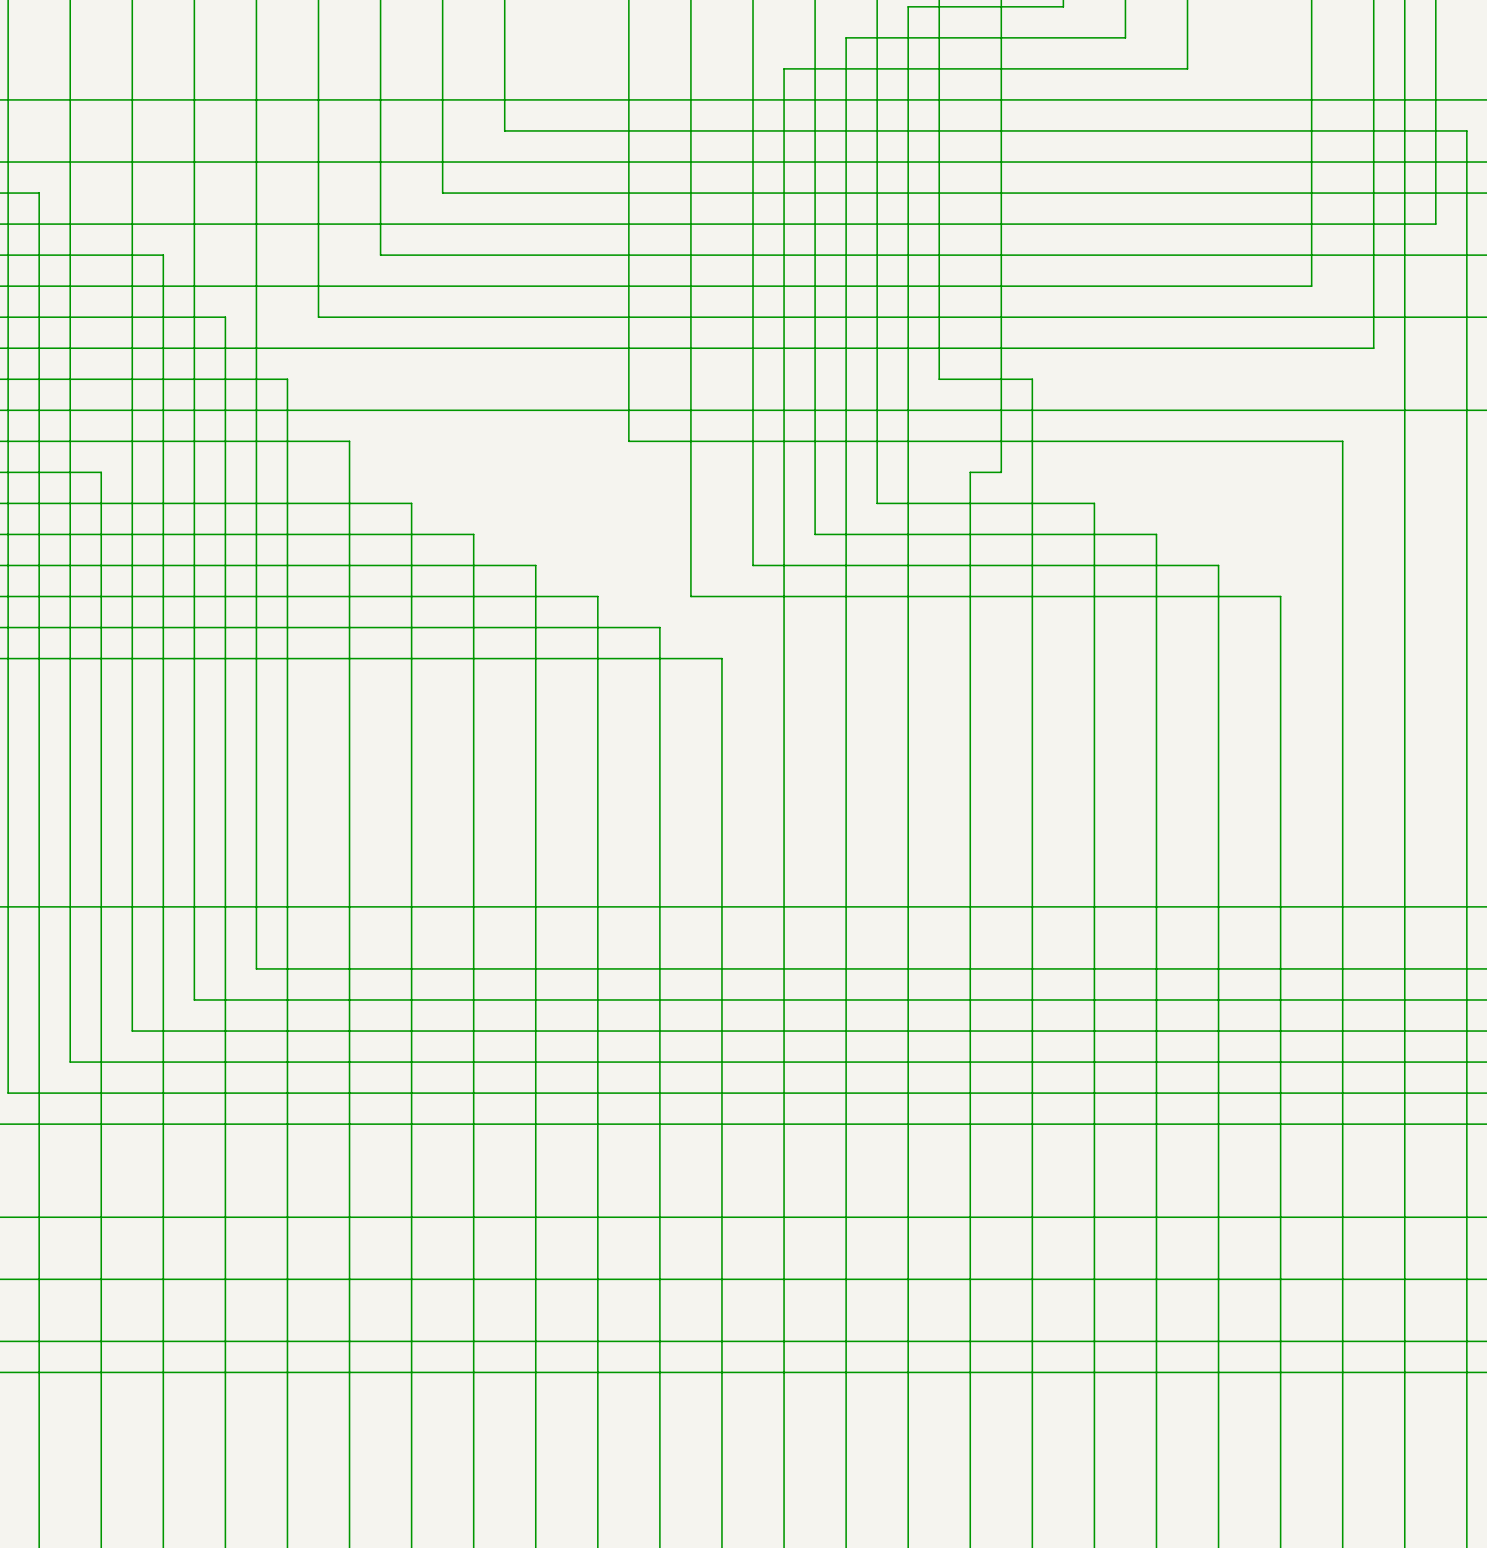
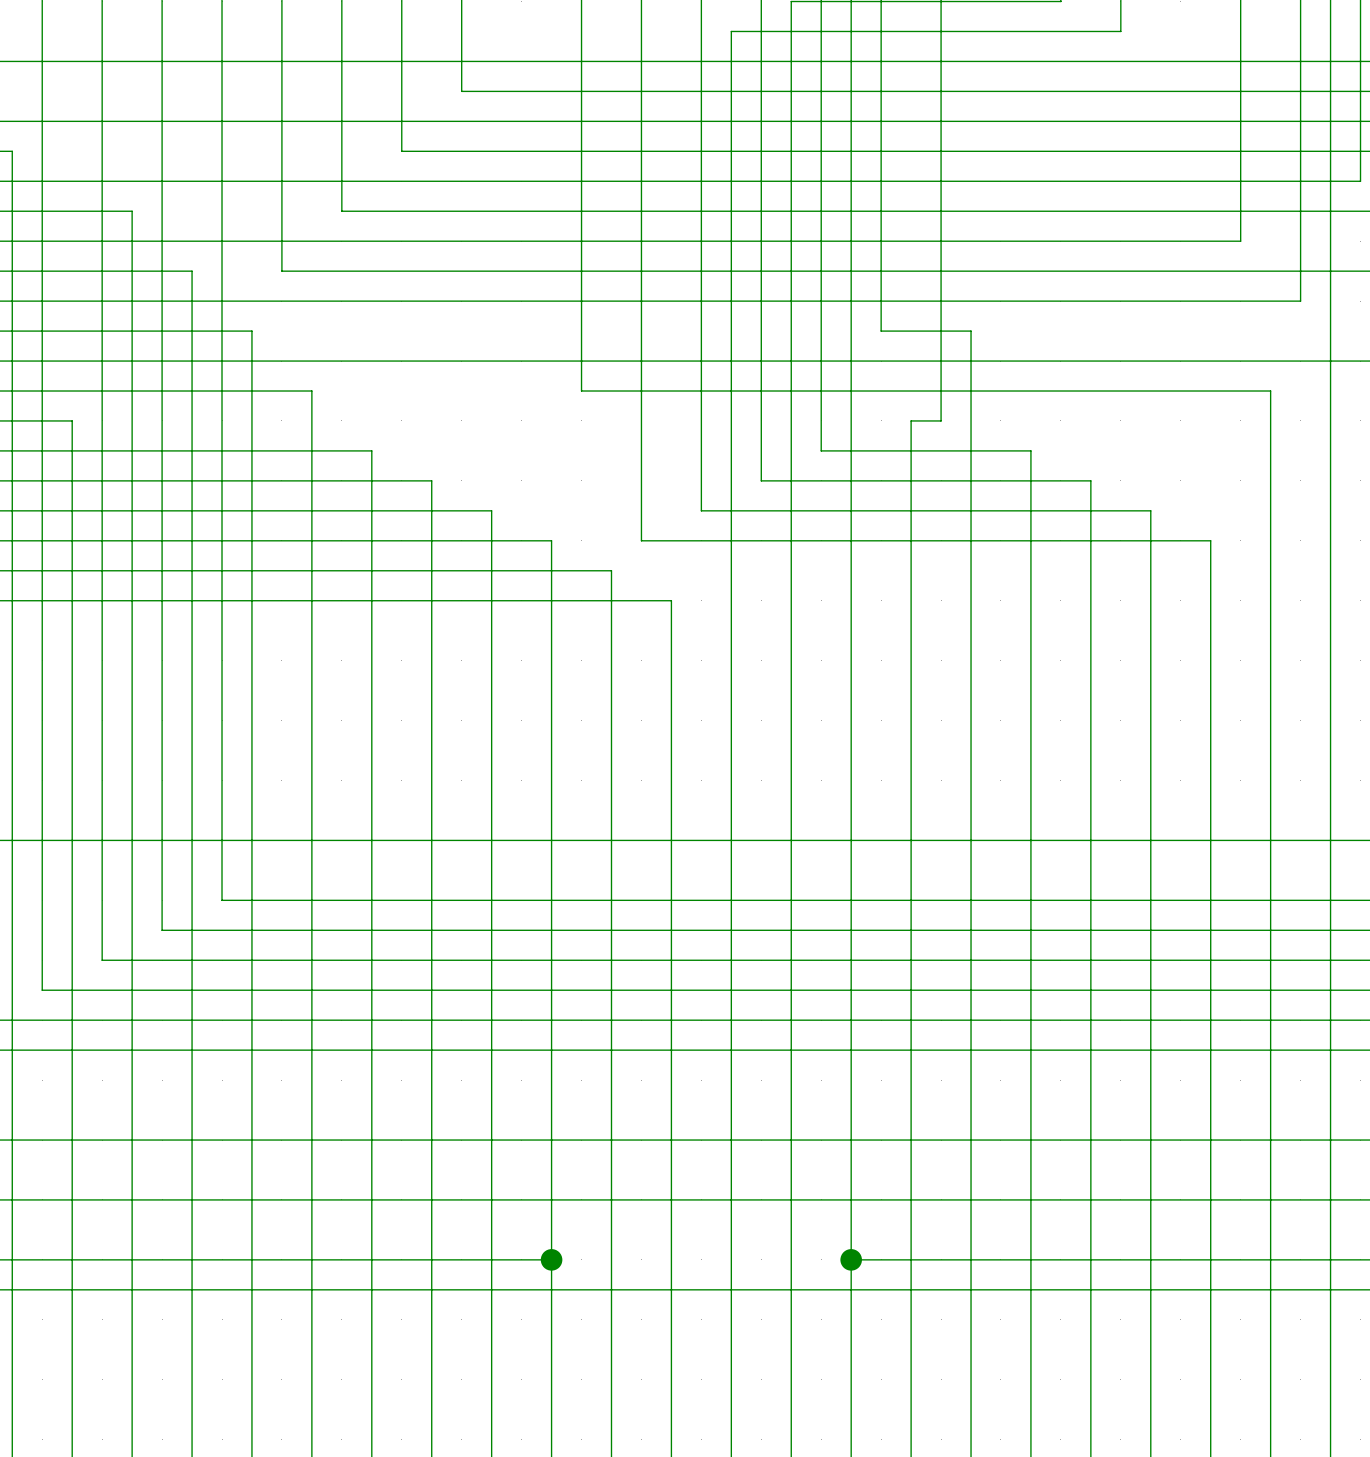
wire: (597, 1341) (908, 1341) -> none
junction: none -> (551, 1259)
junction: none -> (851, 1259)

